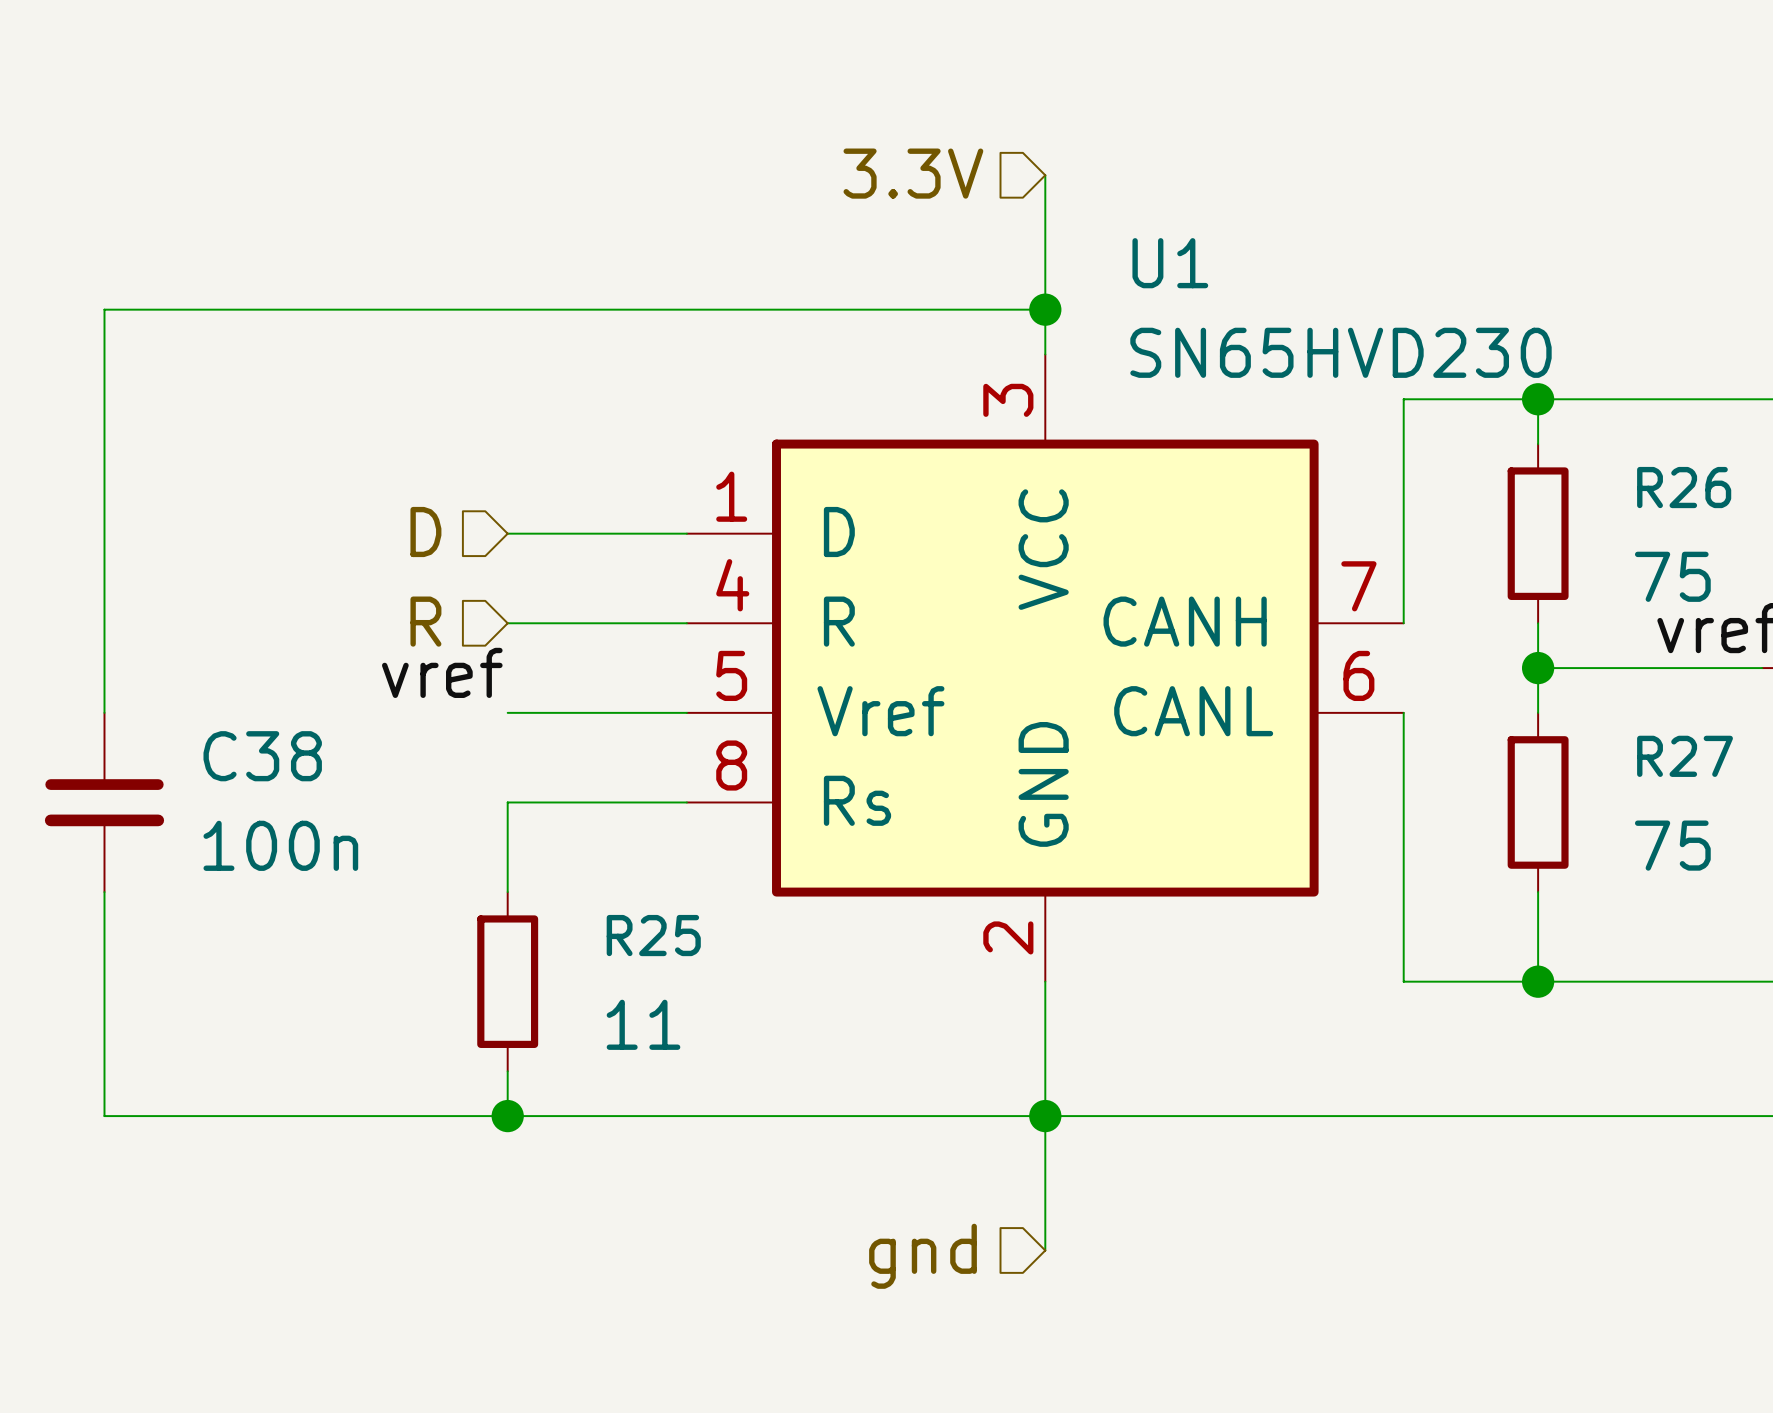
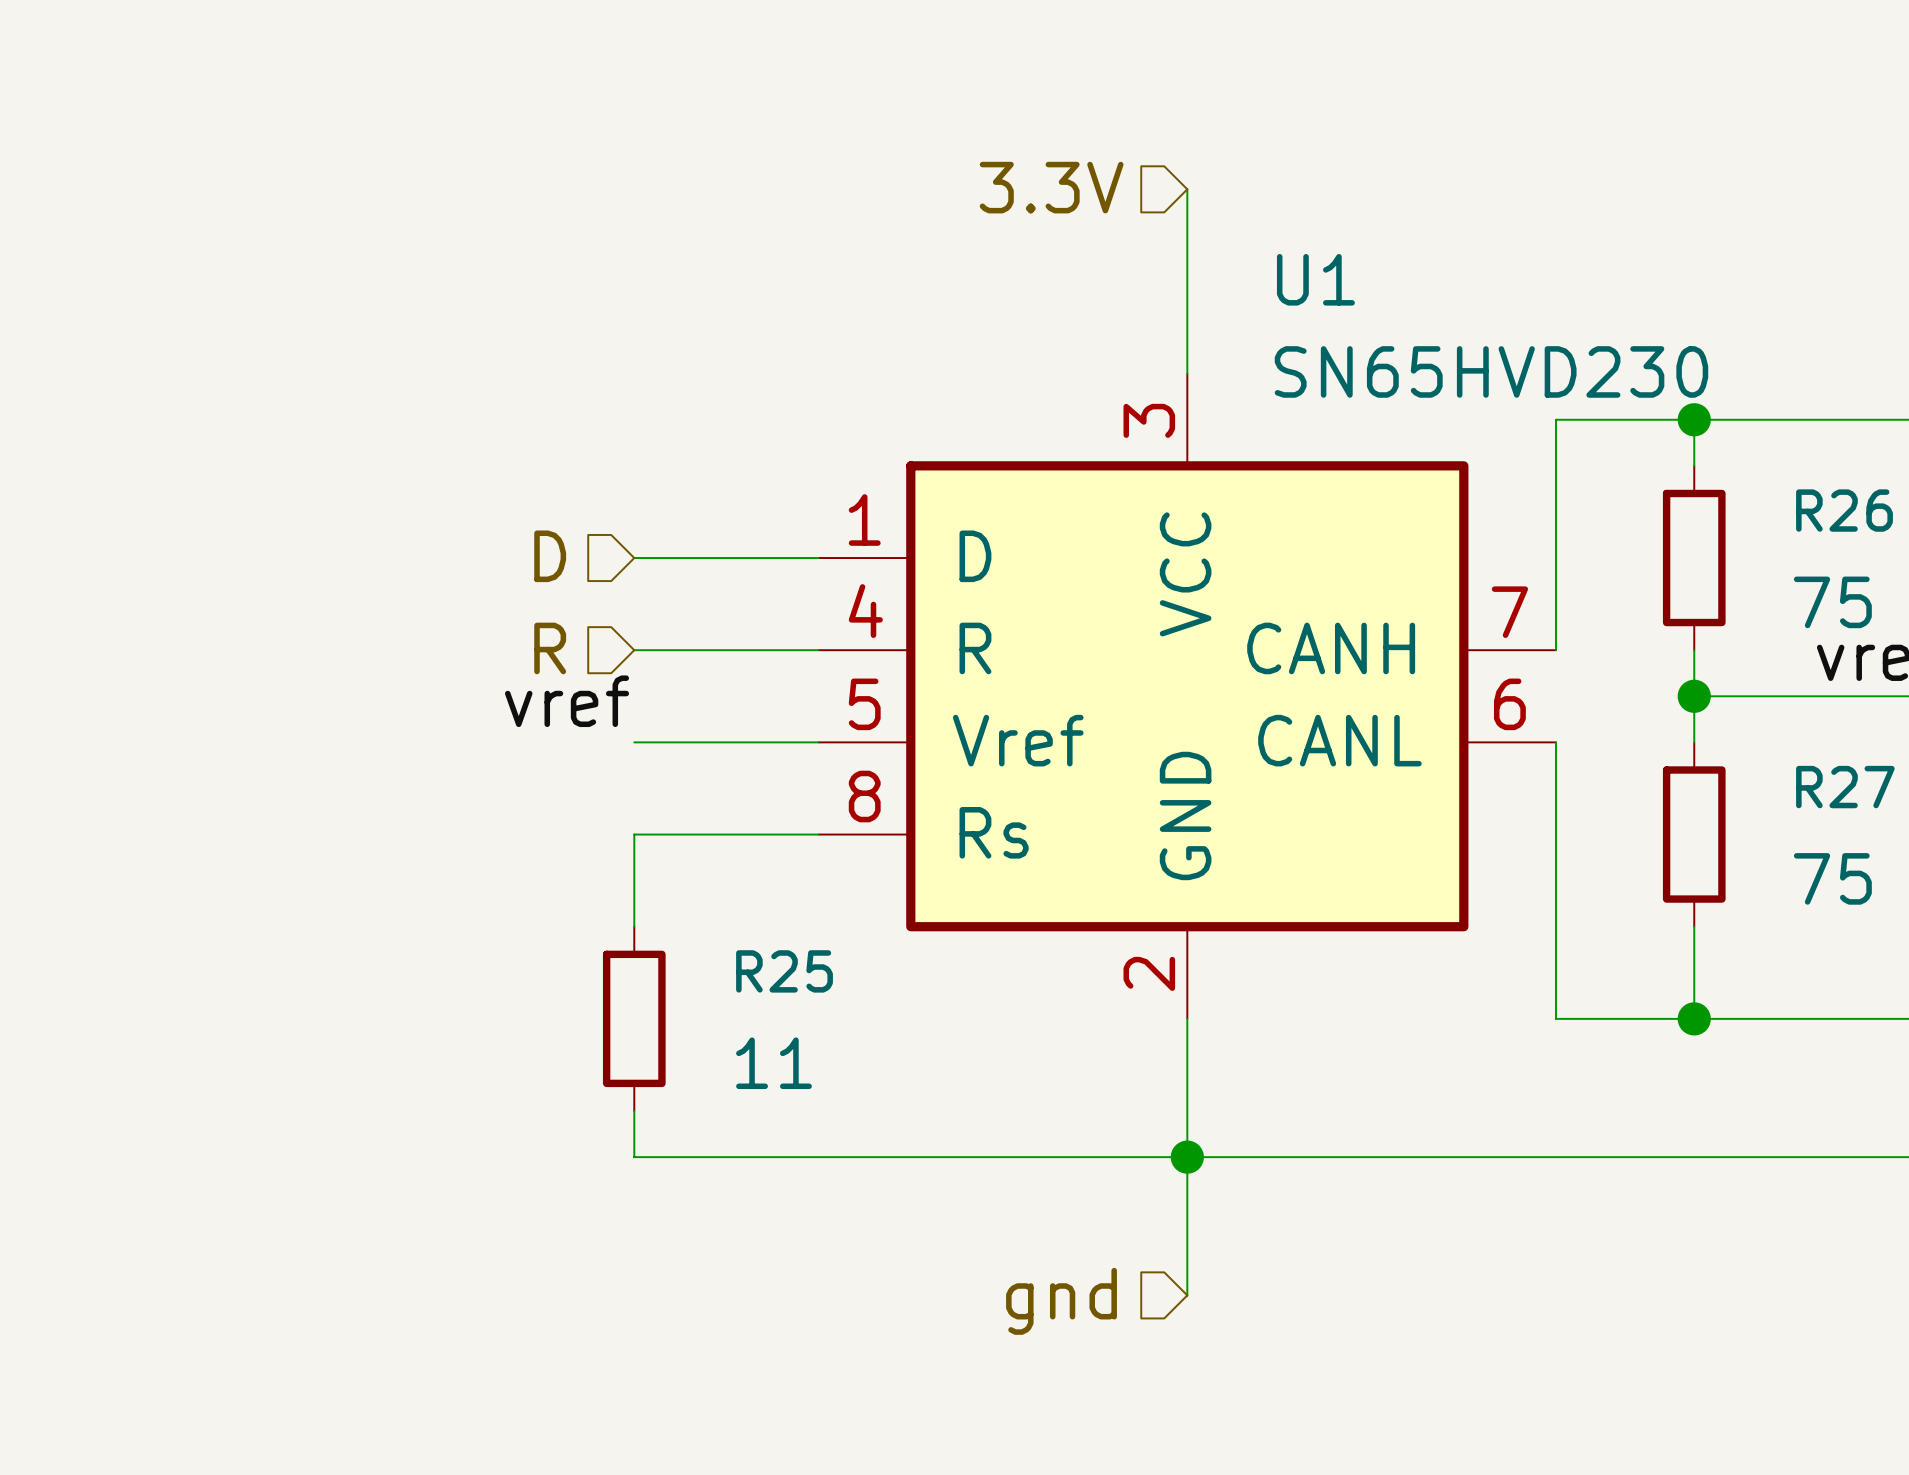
wire: (1045, 309) (104, 309) (104, 712) -> none
junction: (1045, 309) -> none
C38: 100n (104, 802) -> none
wire: (104, 892) (104, 1116) (507, 1116) -> none
junction: (507, 1116) -> none

